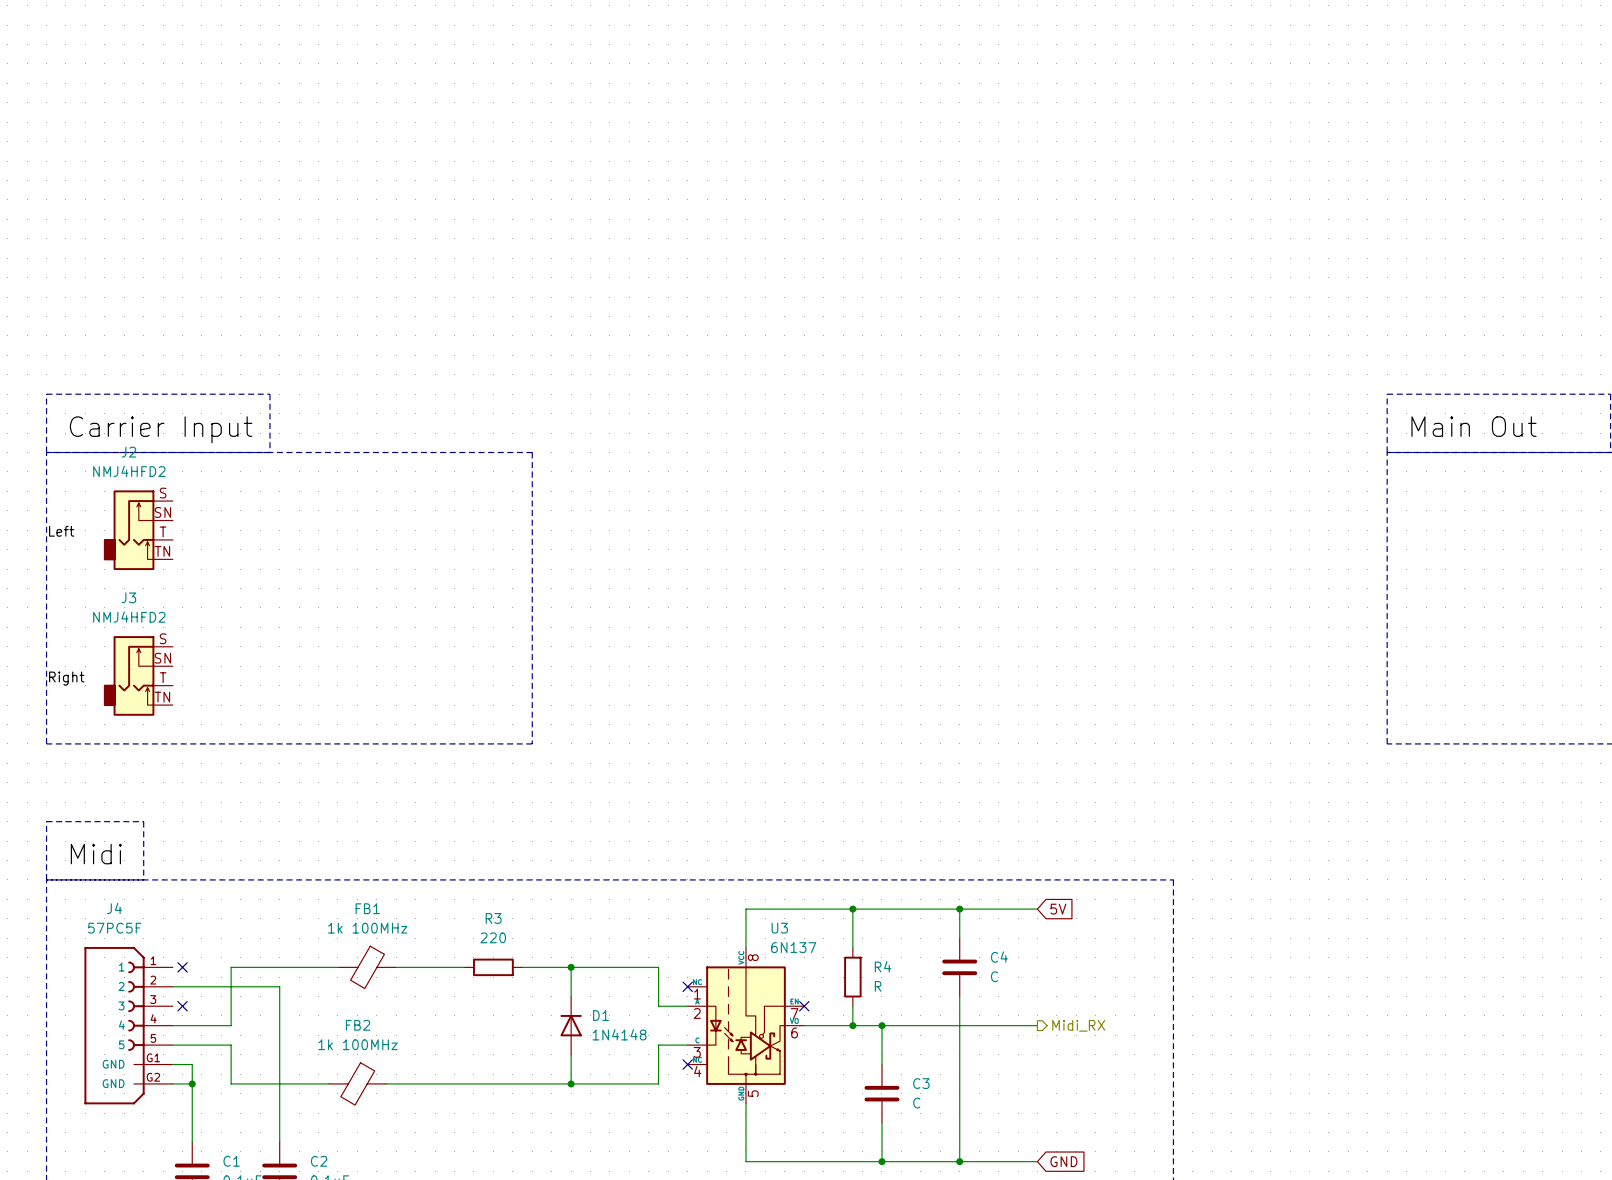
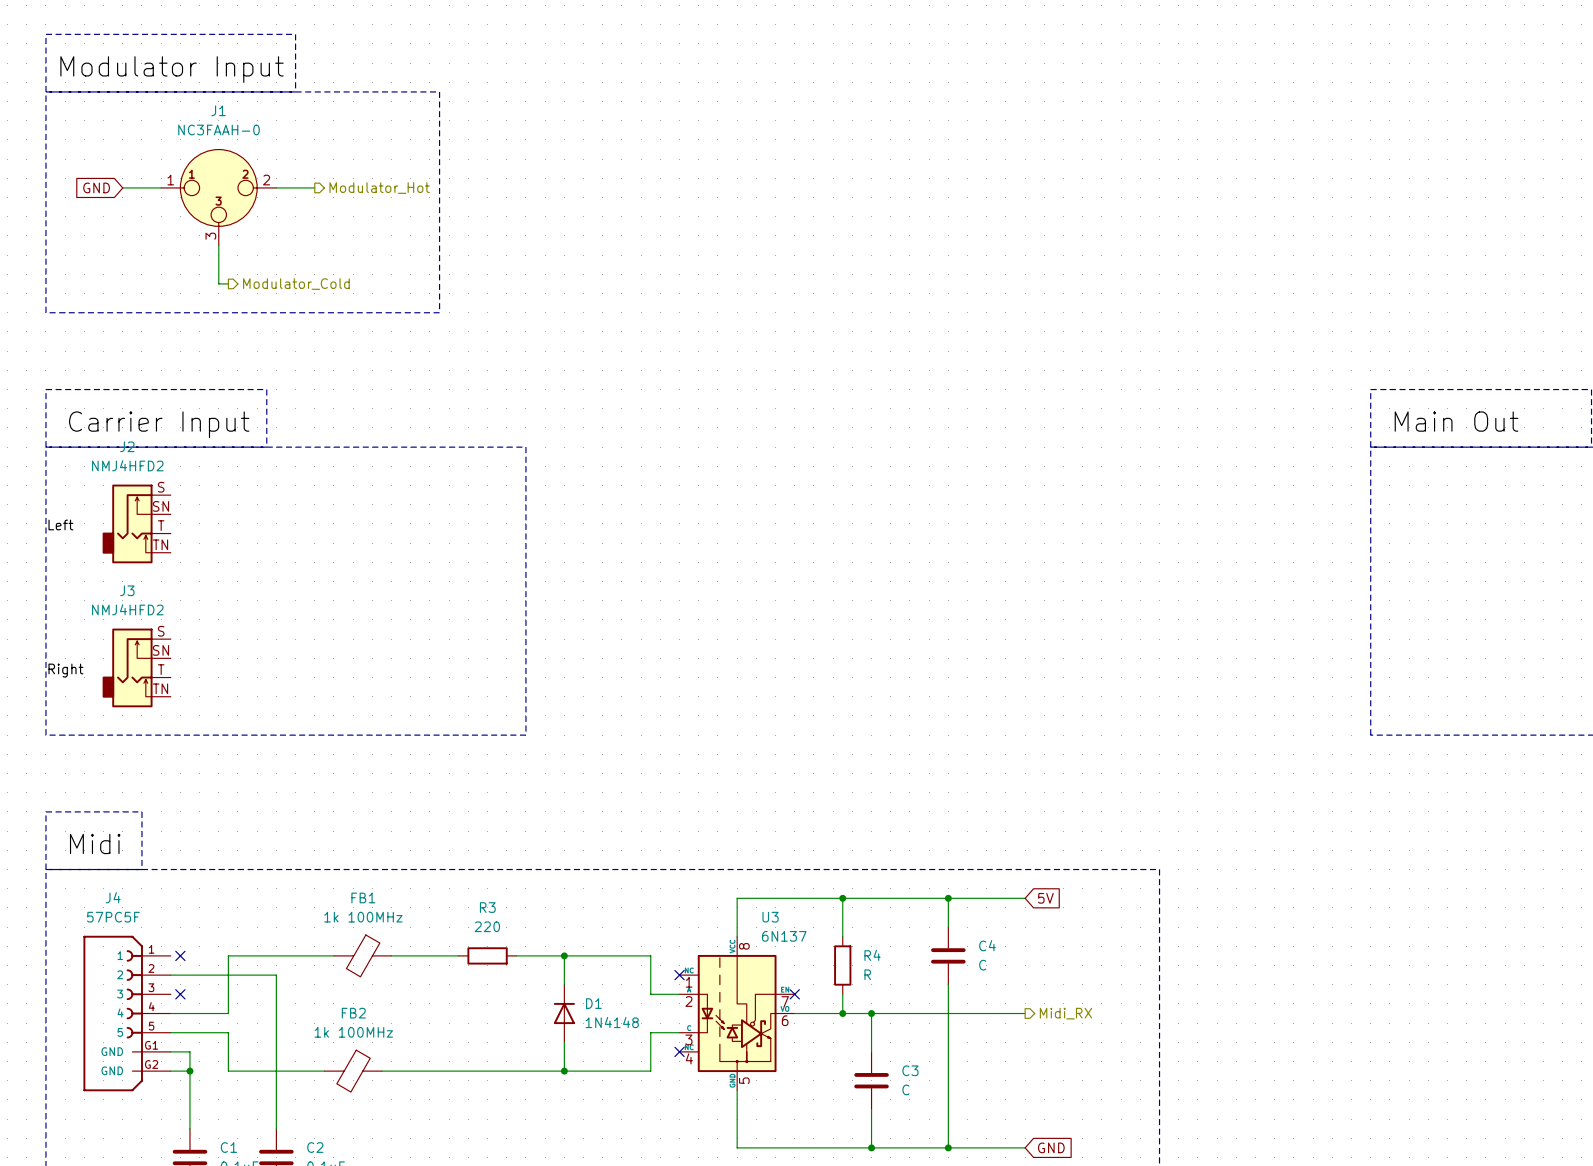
label: none -> Modulator Input (172, 69)
line: none -> (45, 91) (439, 91) (439, 312) (45, 312) (45, 34) (295, 34) (295, 91)
global label: none -> GND (96, 187)
wire: none -> (122, 187) (161, 187)
wire: none -> (276, 187) (314, 187)
hierarchical label: none -> Modulator_Hot (379, 188)
J1: none -> NC3FAAH-0 (218, 197)
wire: none -> (218, 245) (218, 283) (228, 283)
hierarchical label: none -> Modulator_Cold (296, 284)

